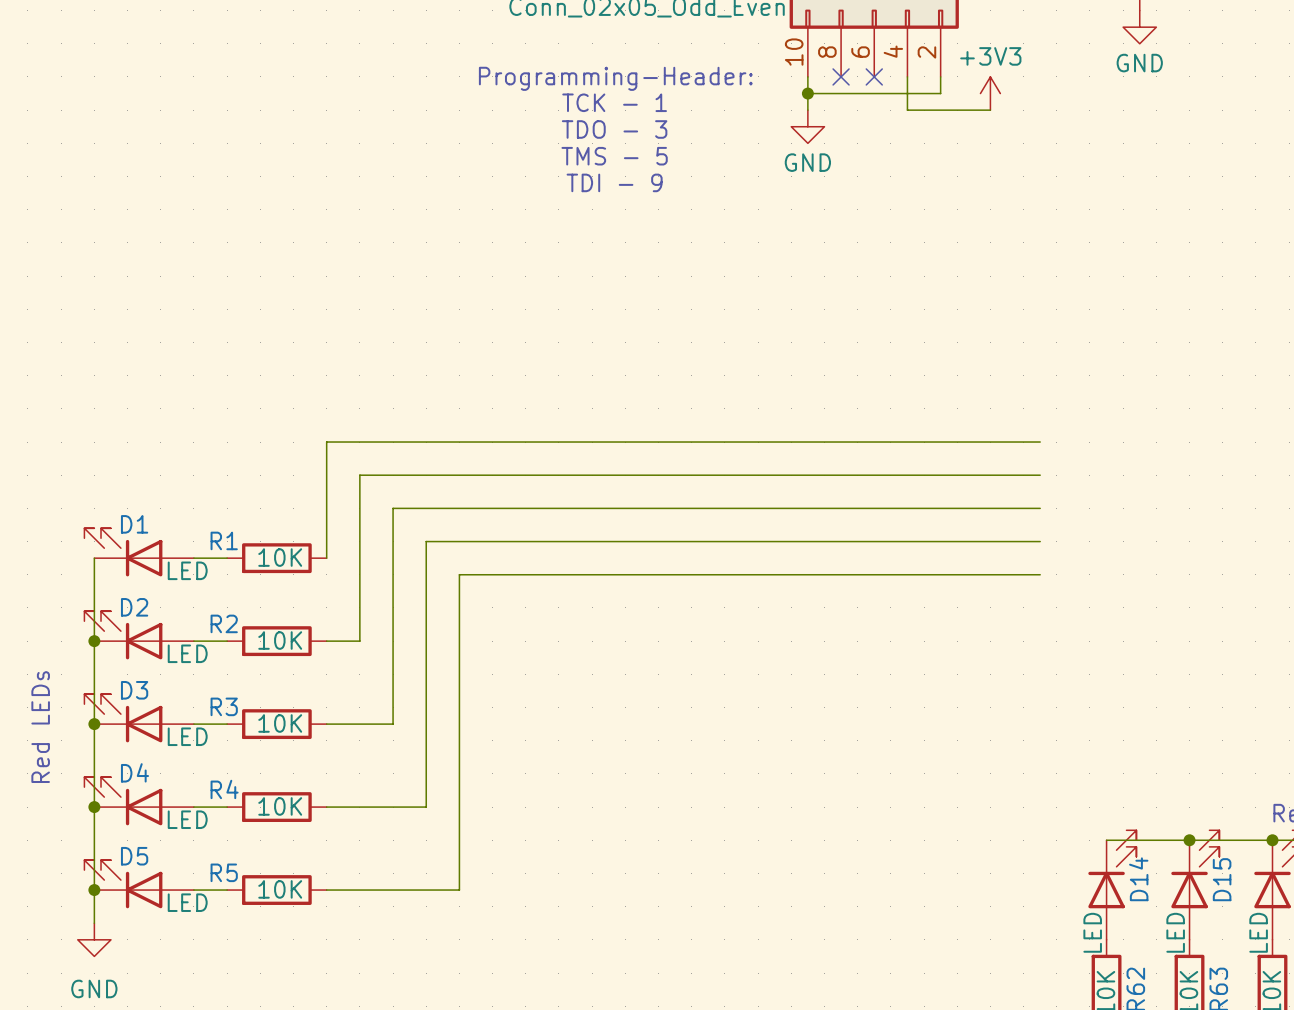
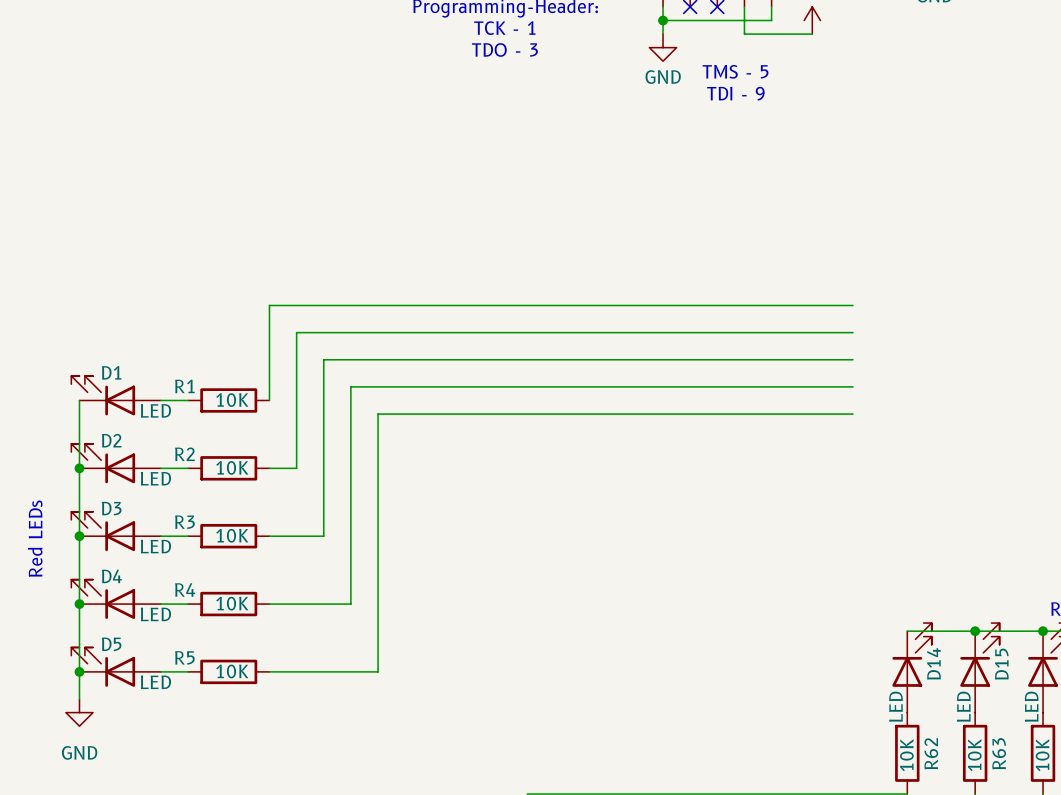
text position: TMS - 5 (614, 156) -> TMS - 5 (735, 71)
text position: TDI - 9 (614, 182) -> TDI - 9 (735, 93)

